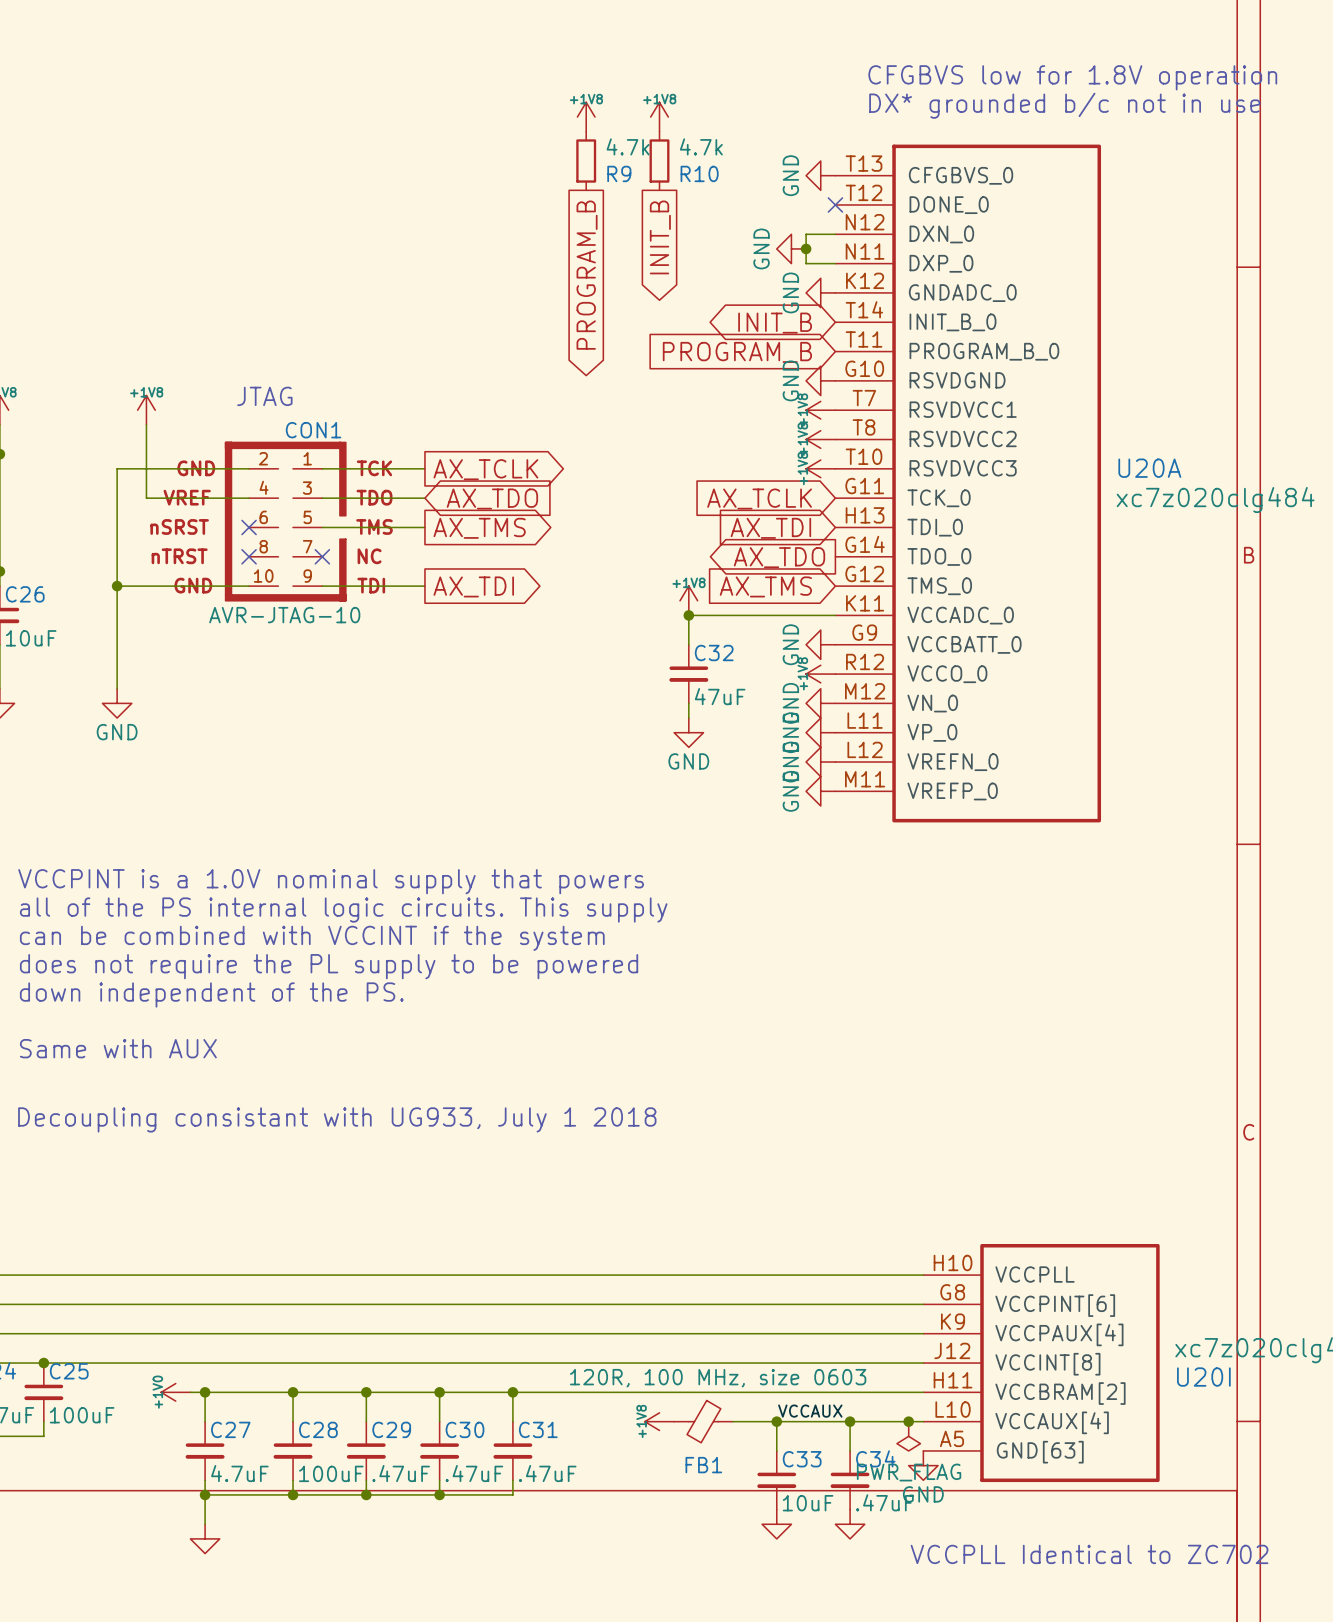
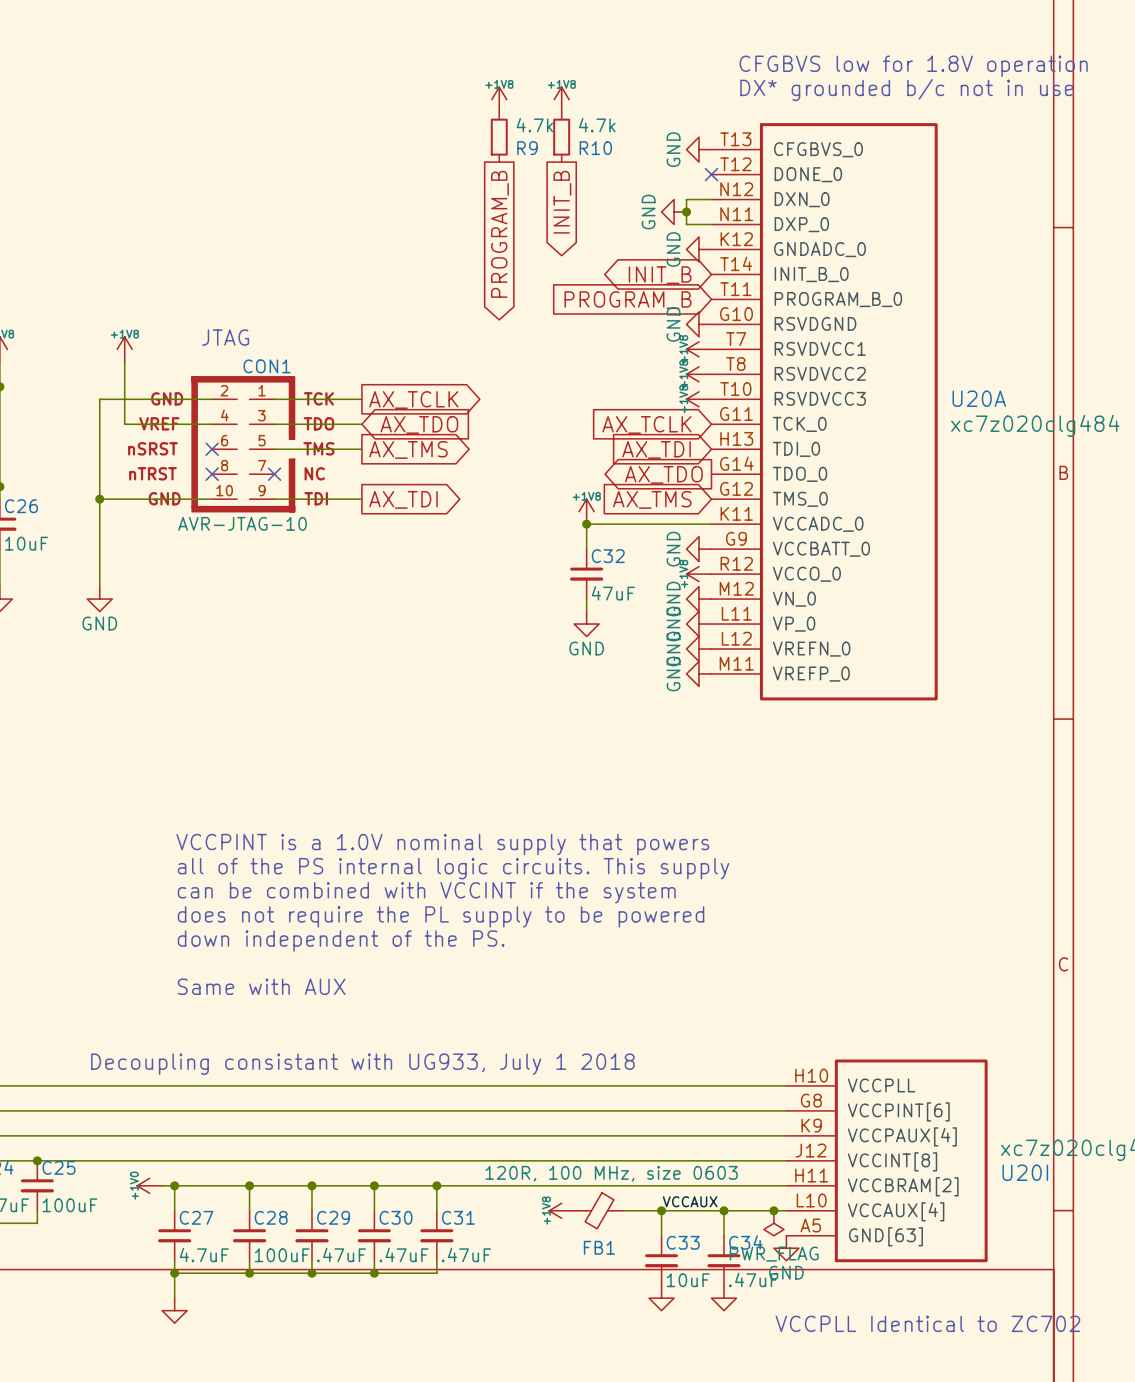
text position: VCCPINT is a 1.0V nominal supply that powers (331, 881) -> VCCPINT is a 1.0V nominal supply that powers (442, 844)
text position: all of the PS internal logic circuits. This supply (343, 910) -> all of the PS internal logic circuits. This supply (453, 868)
text position: can be combined with VCCINT if the system (312, 938) -> can be combined with VCCINT if the system (426, 892)
text position: does not require the PL supply to be powered (329, 966) -> does not require the PL supply to be powered (441, 916)
text position: down independent of the PS. (211, 994) -> down independent of the PS. (341, 941)
text position: Same with AUX (118, 1048) -> Same with AUX (261, 986)
text position: Decoupling consistant with UG933, July 1 2018 (337, 1119) -> Decoupling consistant with UG933, July 1 2018 (362, 1064)

